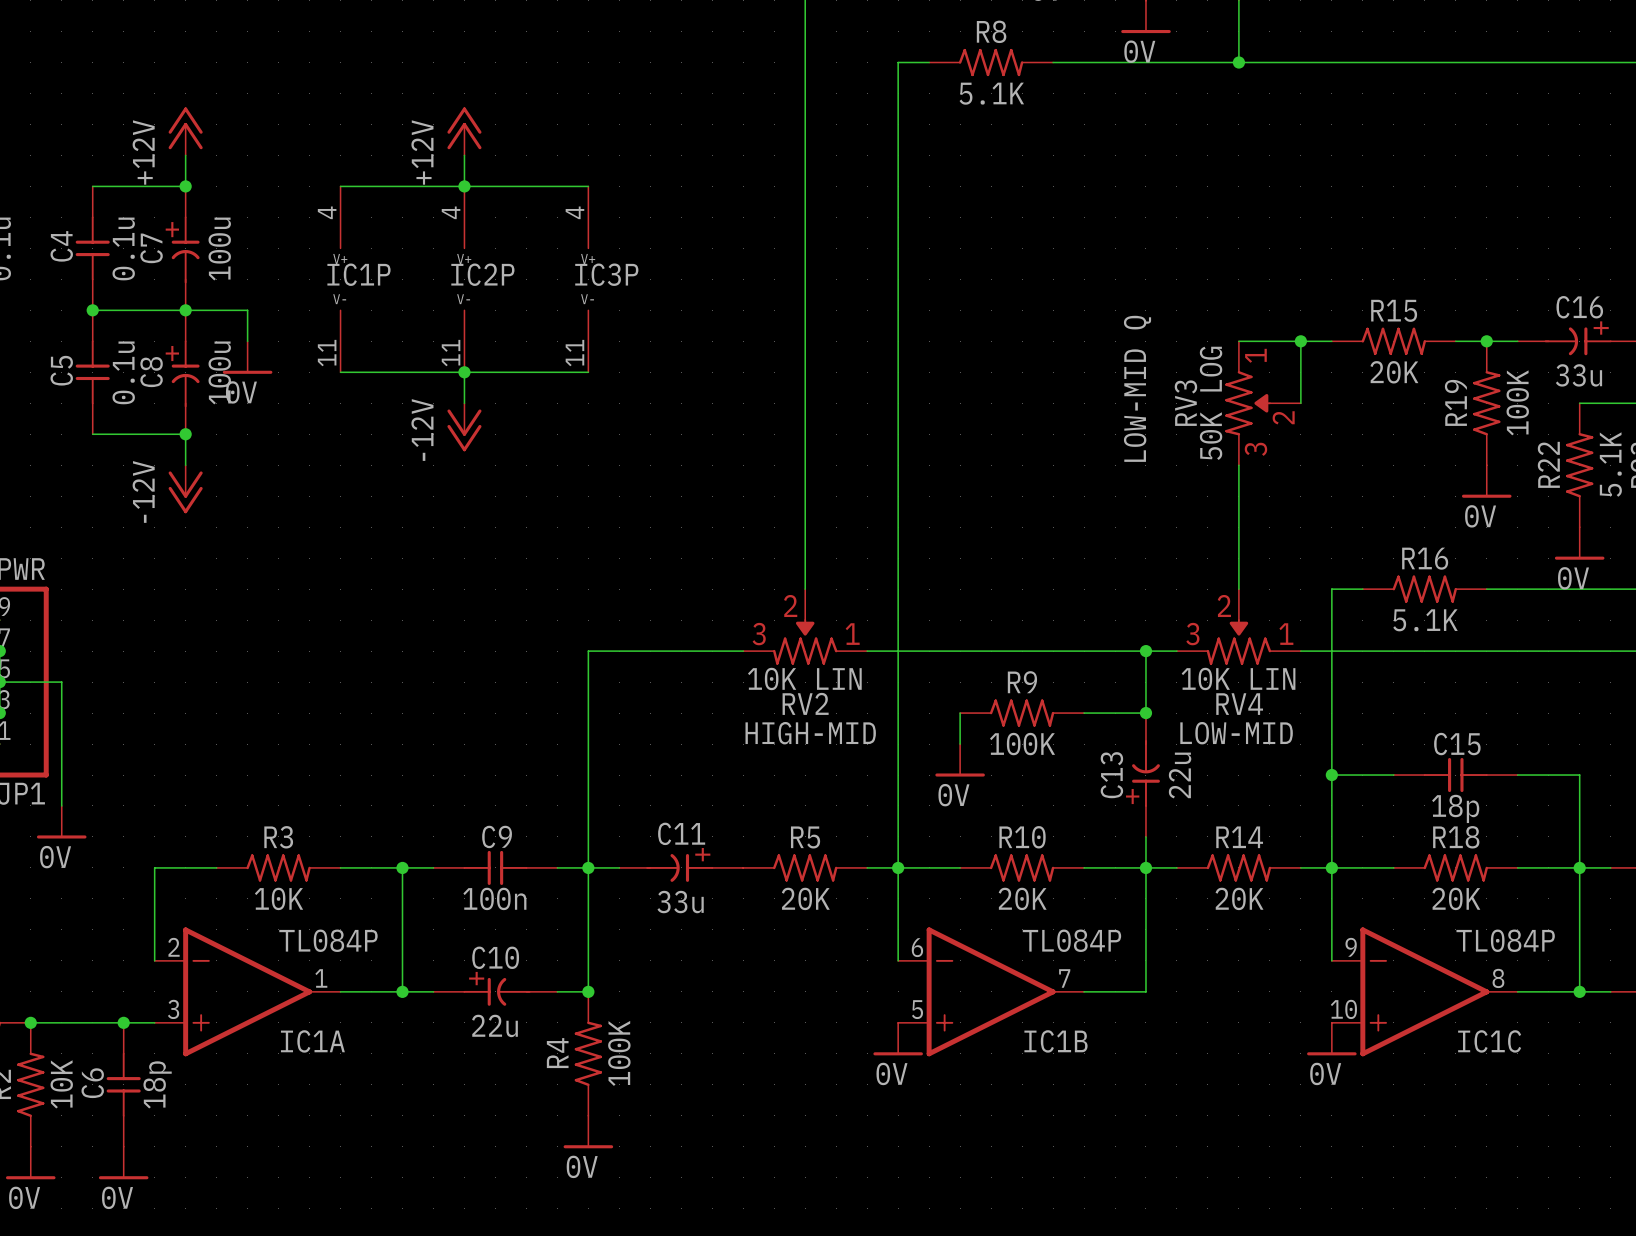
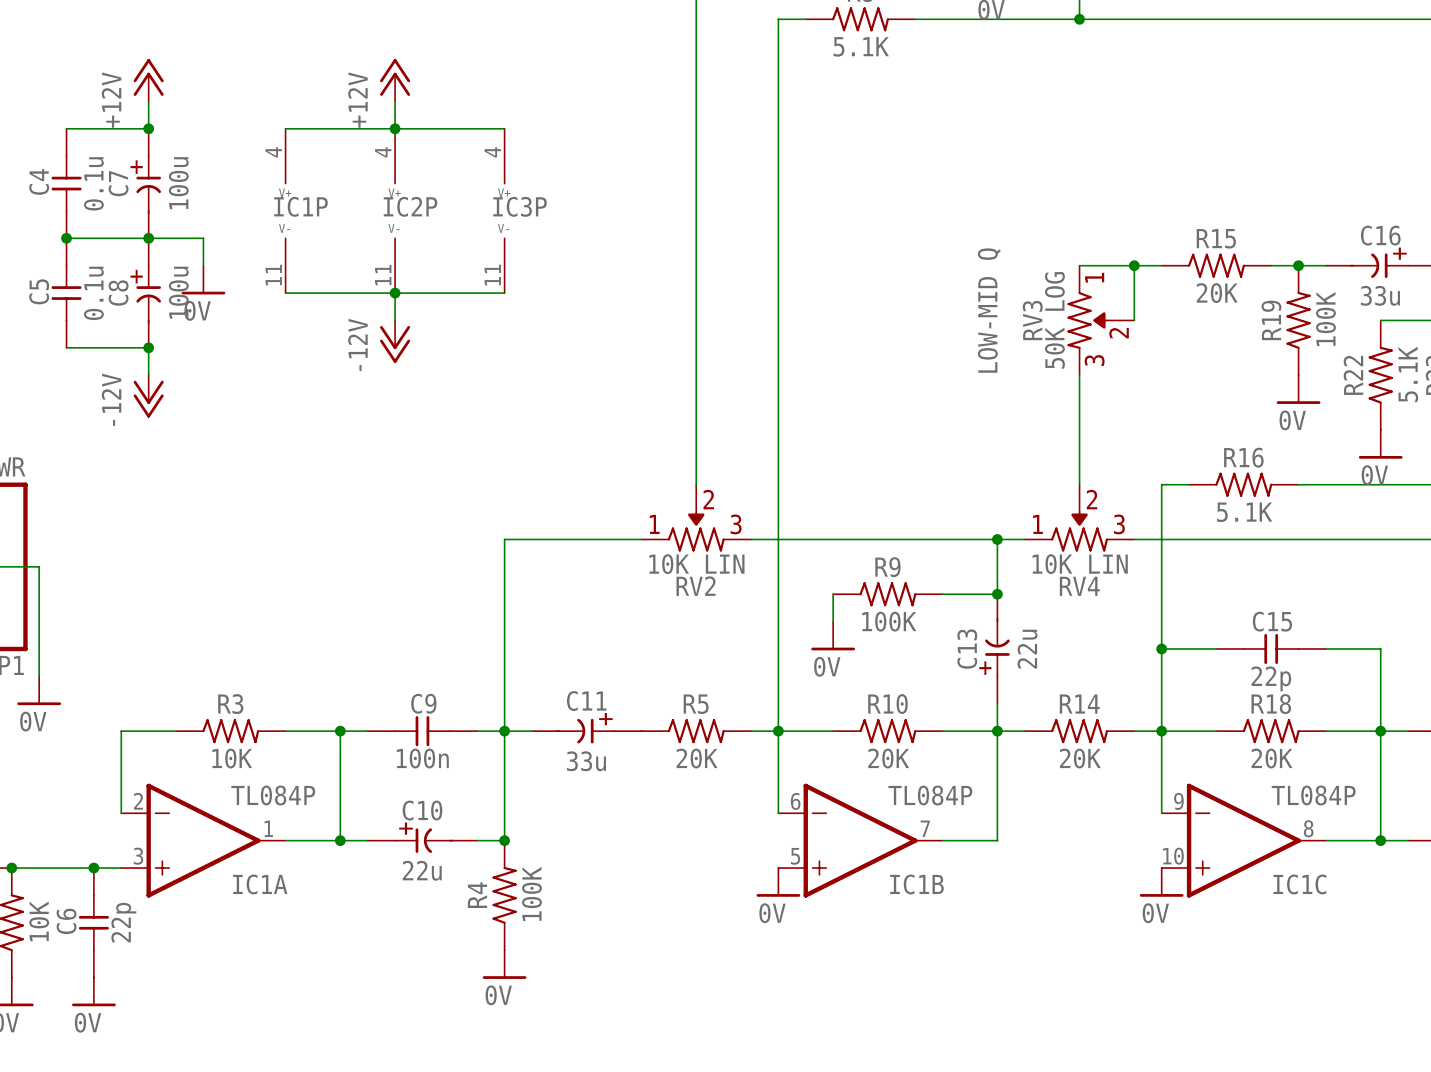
RV2 flip: as is (805, 641) -> left-right (696, 531)
RV4 flip: as is (1238, 641) -> left-right (1079, 531)
text: HIGH-MID (810, 733) -> none
text: LOW-MID (1236, 733) -> none
C15 value: 18p (1455, 808) -> 22p (1271, 678)
C6 value: 18p (157, 1084) -> 22p (123, 922)

